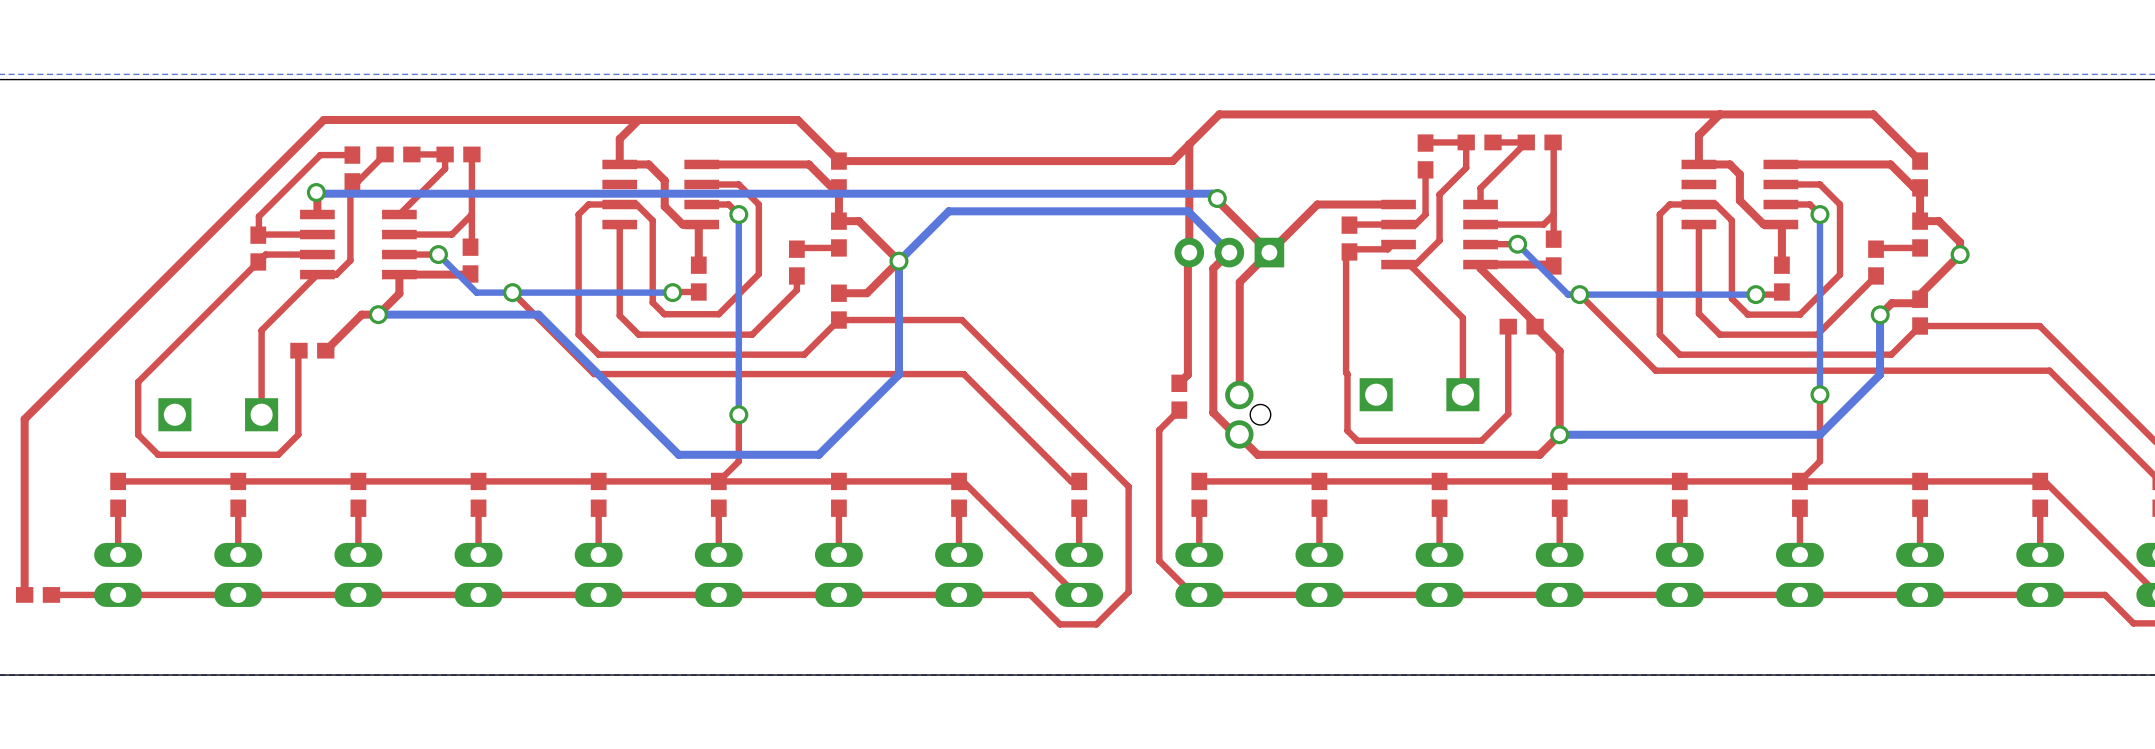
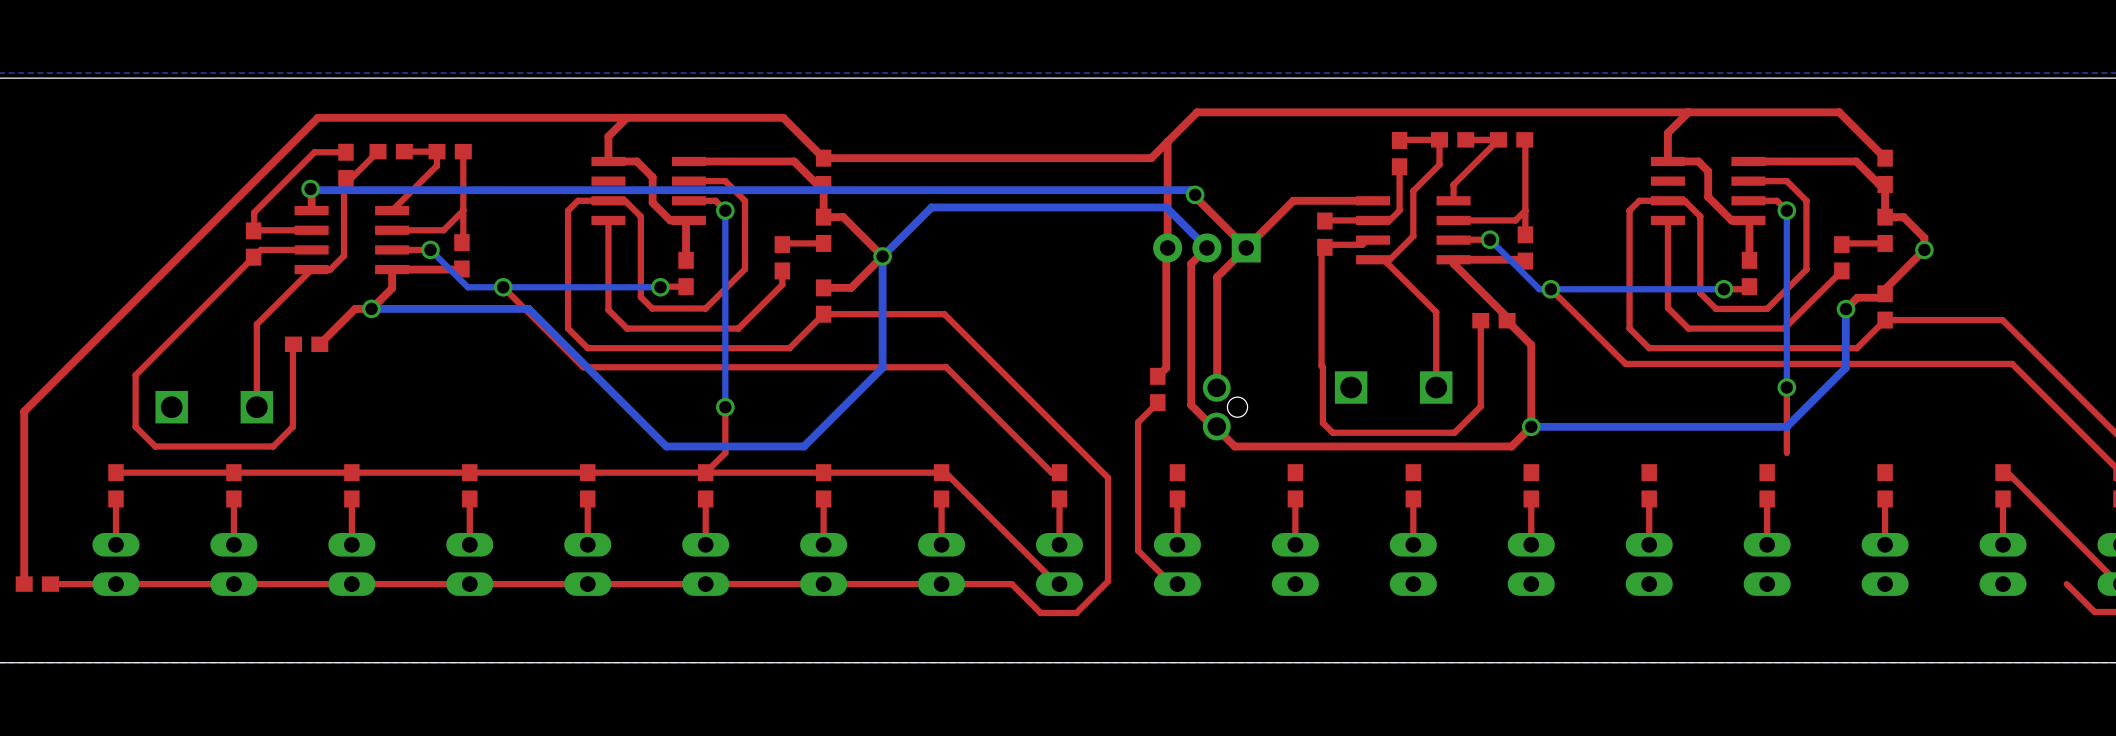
top track: (1819, 461) (1799, 481) -> none
top track: (2044, 481) (1199, 481) -> none
top track: (2105, 594) (1193, 594) -> none

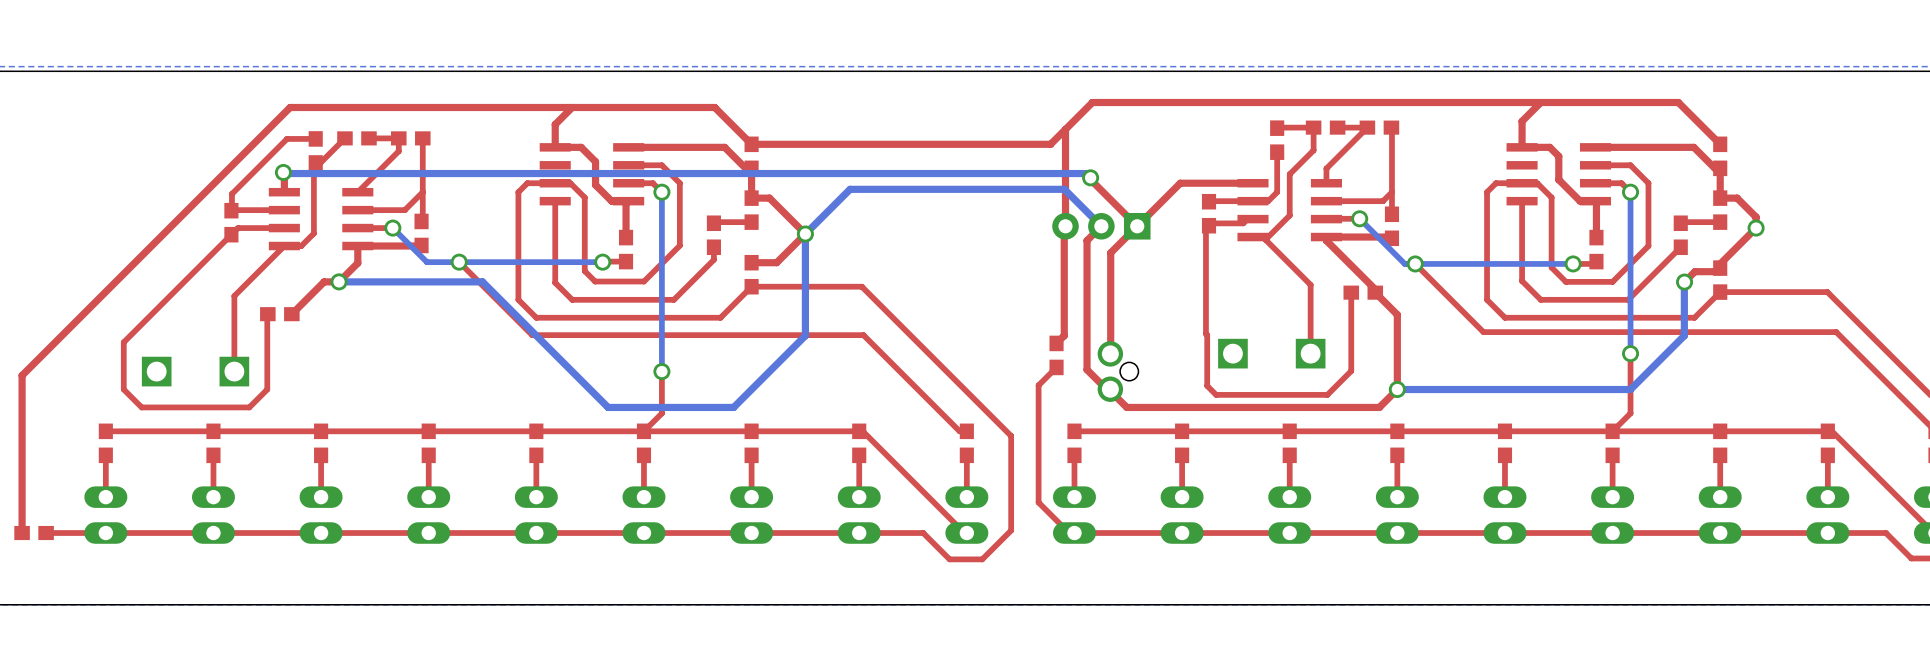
top track: none -> (1630, 413) (1612, 431)
top track: none -> (1831, 431) (1074, 431)
top track: none -> (1885, 533) (1069, 533)

